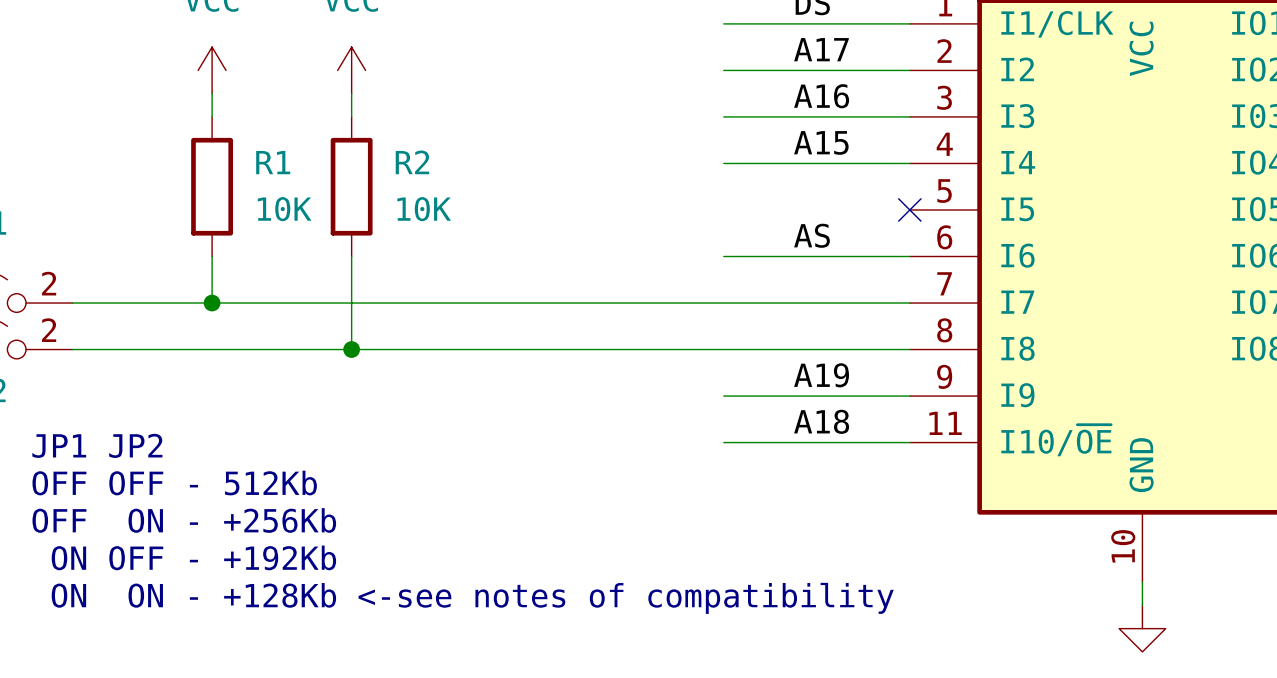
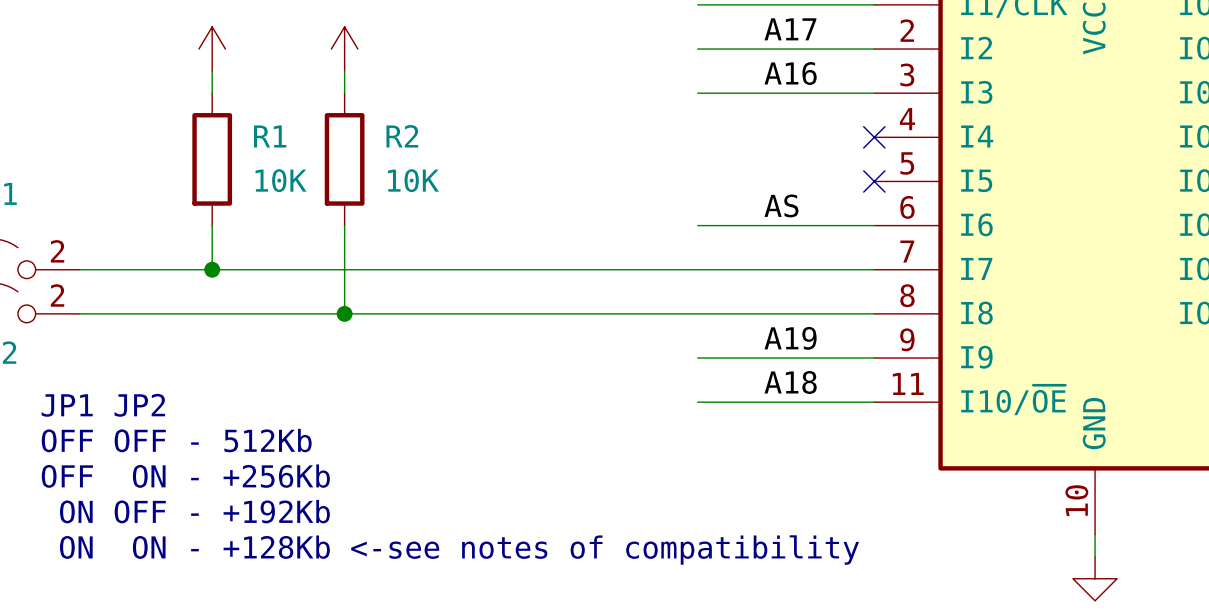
label: A15 (821, 142) -> none
wire: (723, 163) (909, 163) -> none
no-connect mark: none -> (874, 137)

